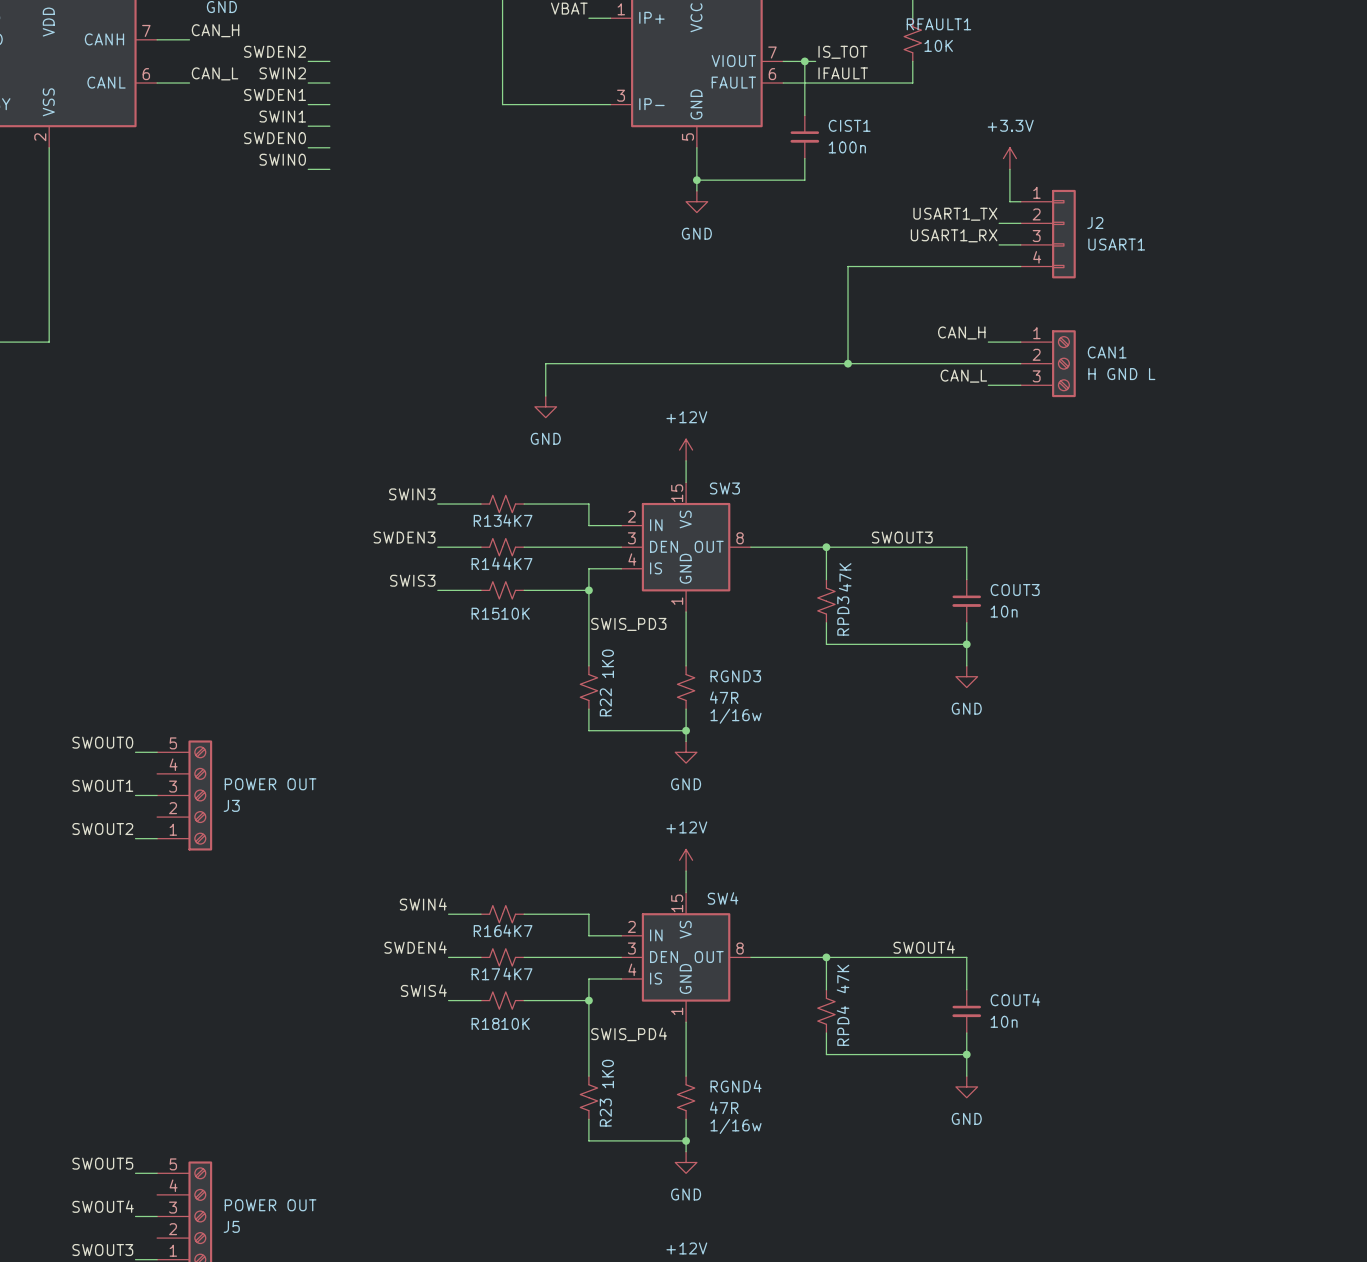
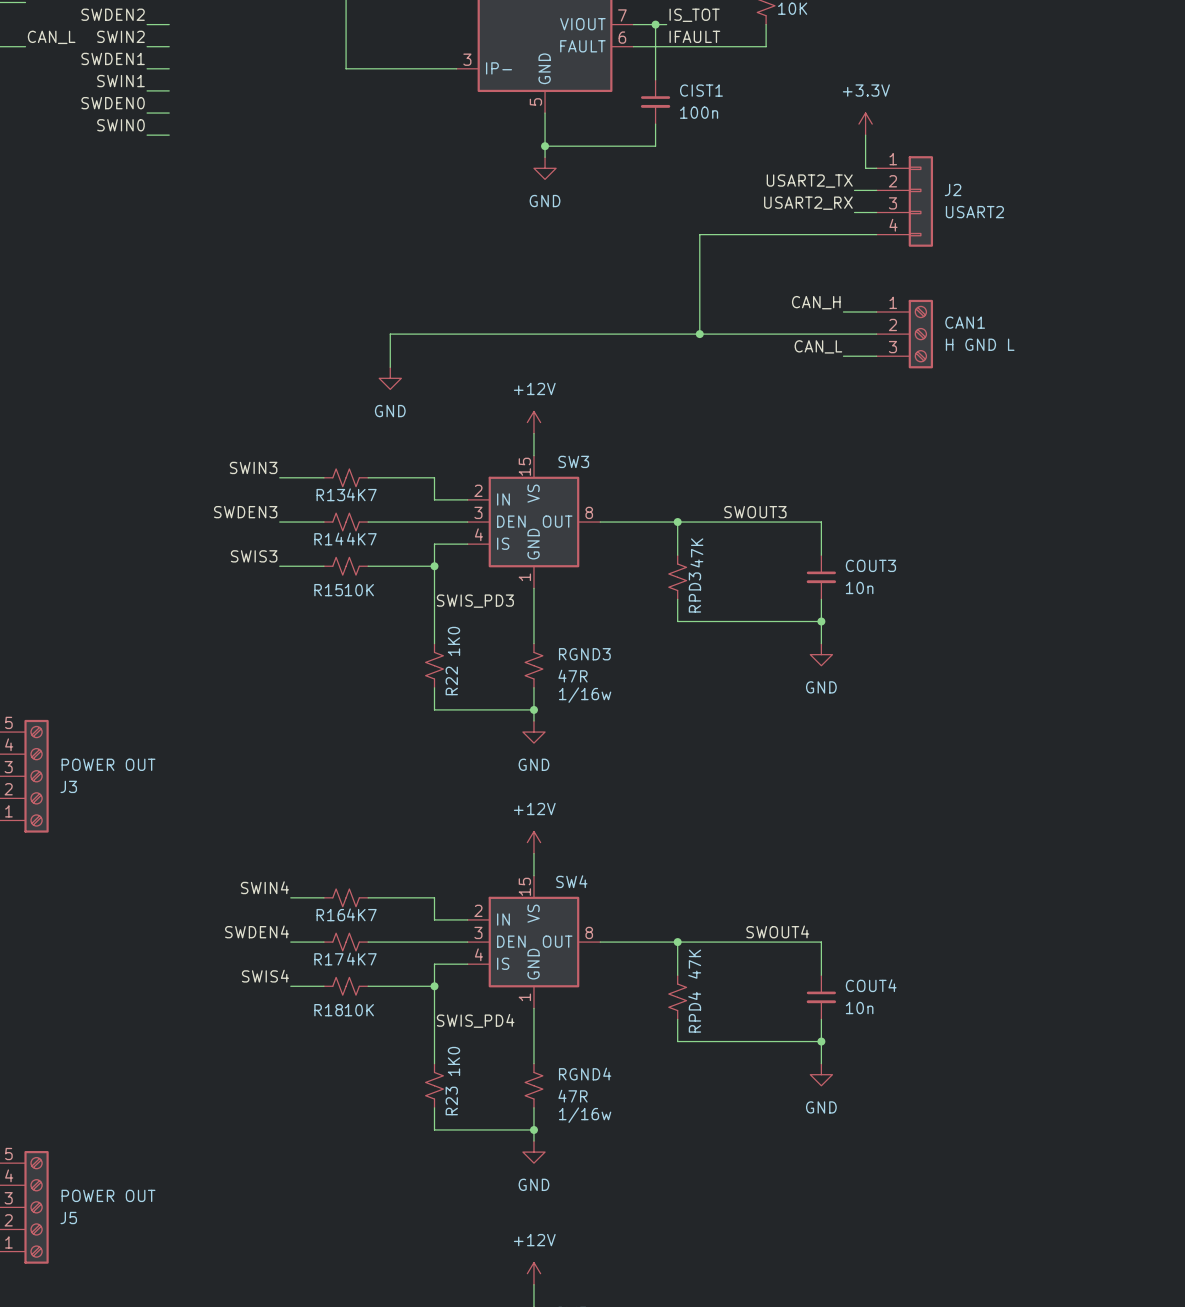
label: USART1_TX (955, 214) -> USART2_TX (809, 181)
label: USART1_RX (954, 235) -> USART2_RX (808, 203)
J2 value: USART1 (1116, 244) -> USART2 (974, 212)

